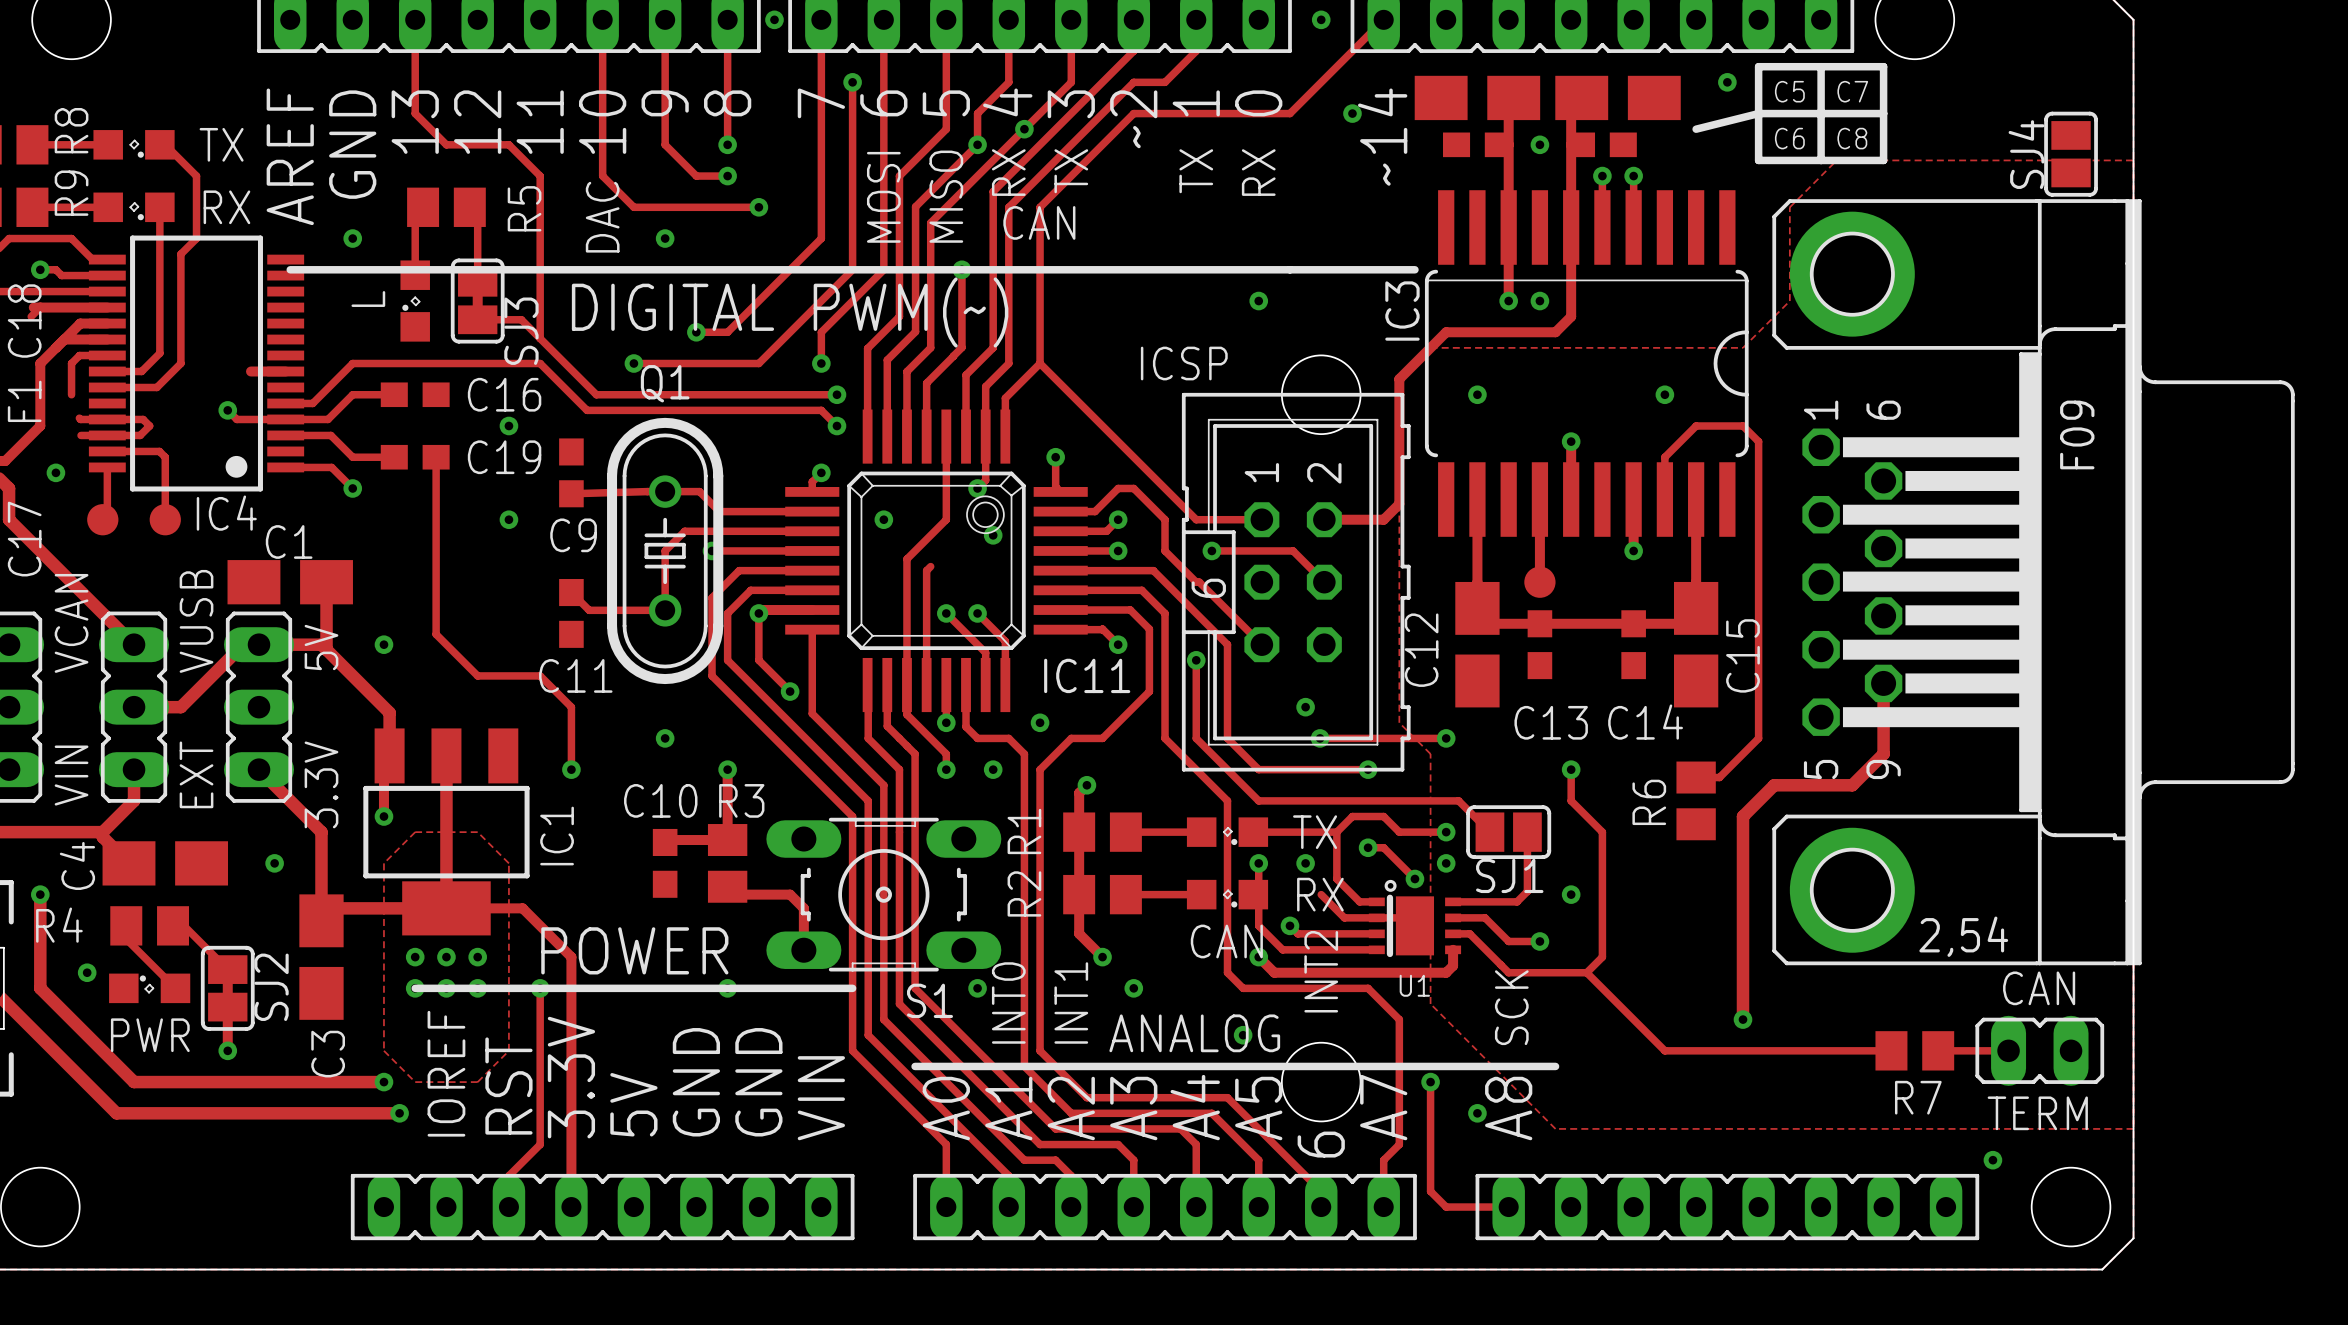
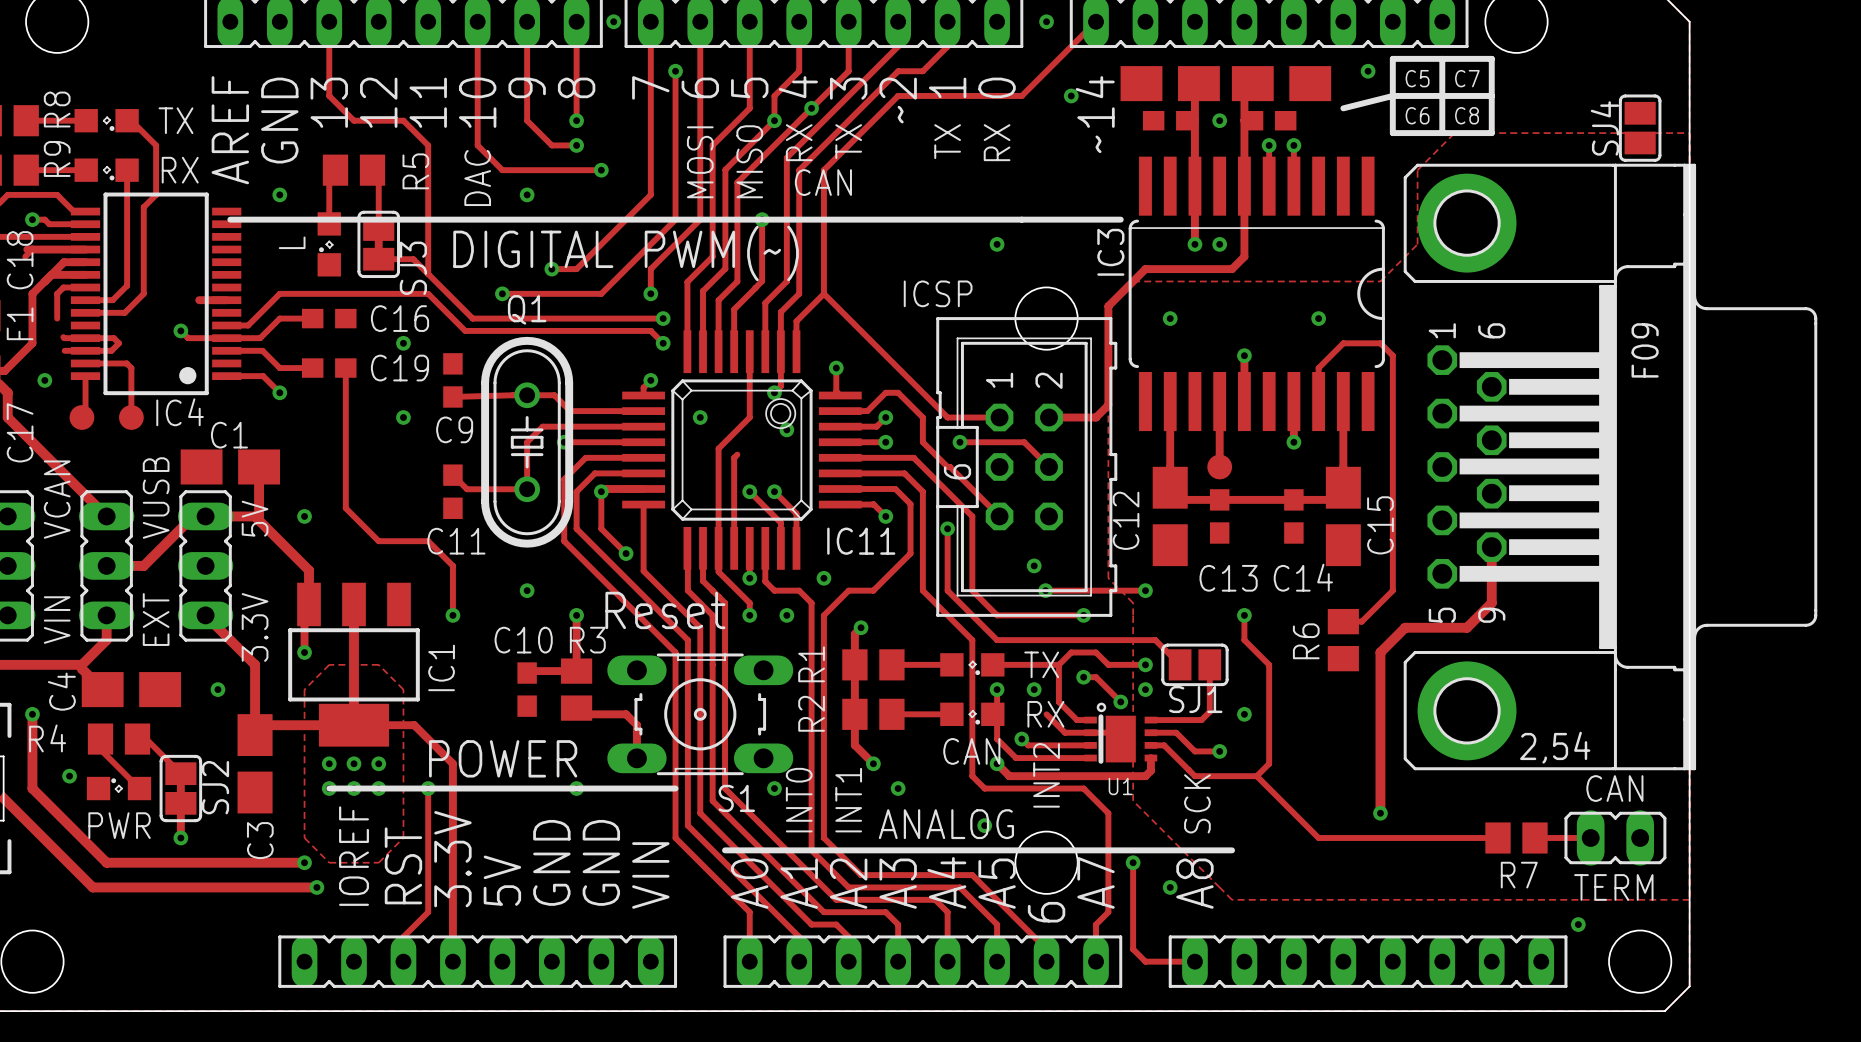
text: none -> Reset (665, 610)

